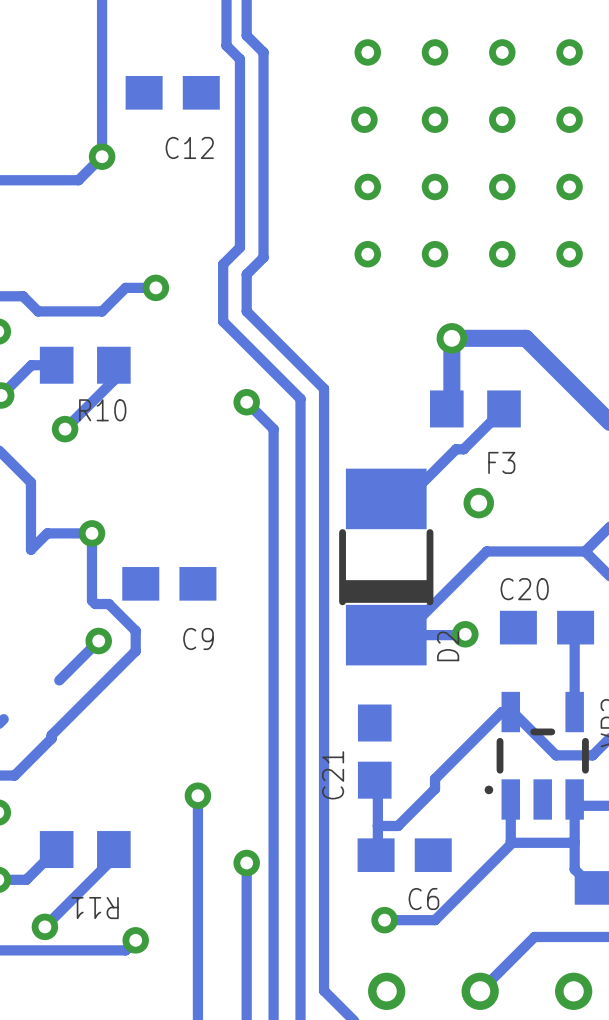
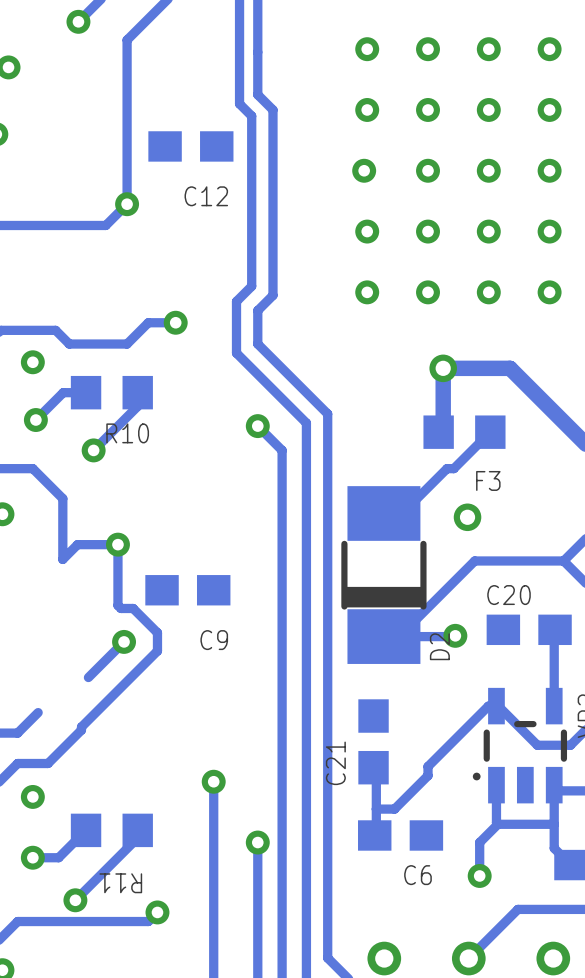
track: (492, 862) (435, 920) (384, 920) -> (479, 842) (479, 875)
via position: (384, 920) -> (479, 875)

